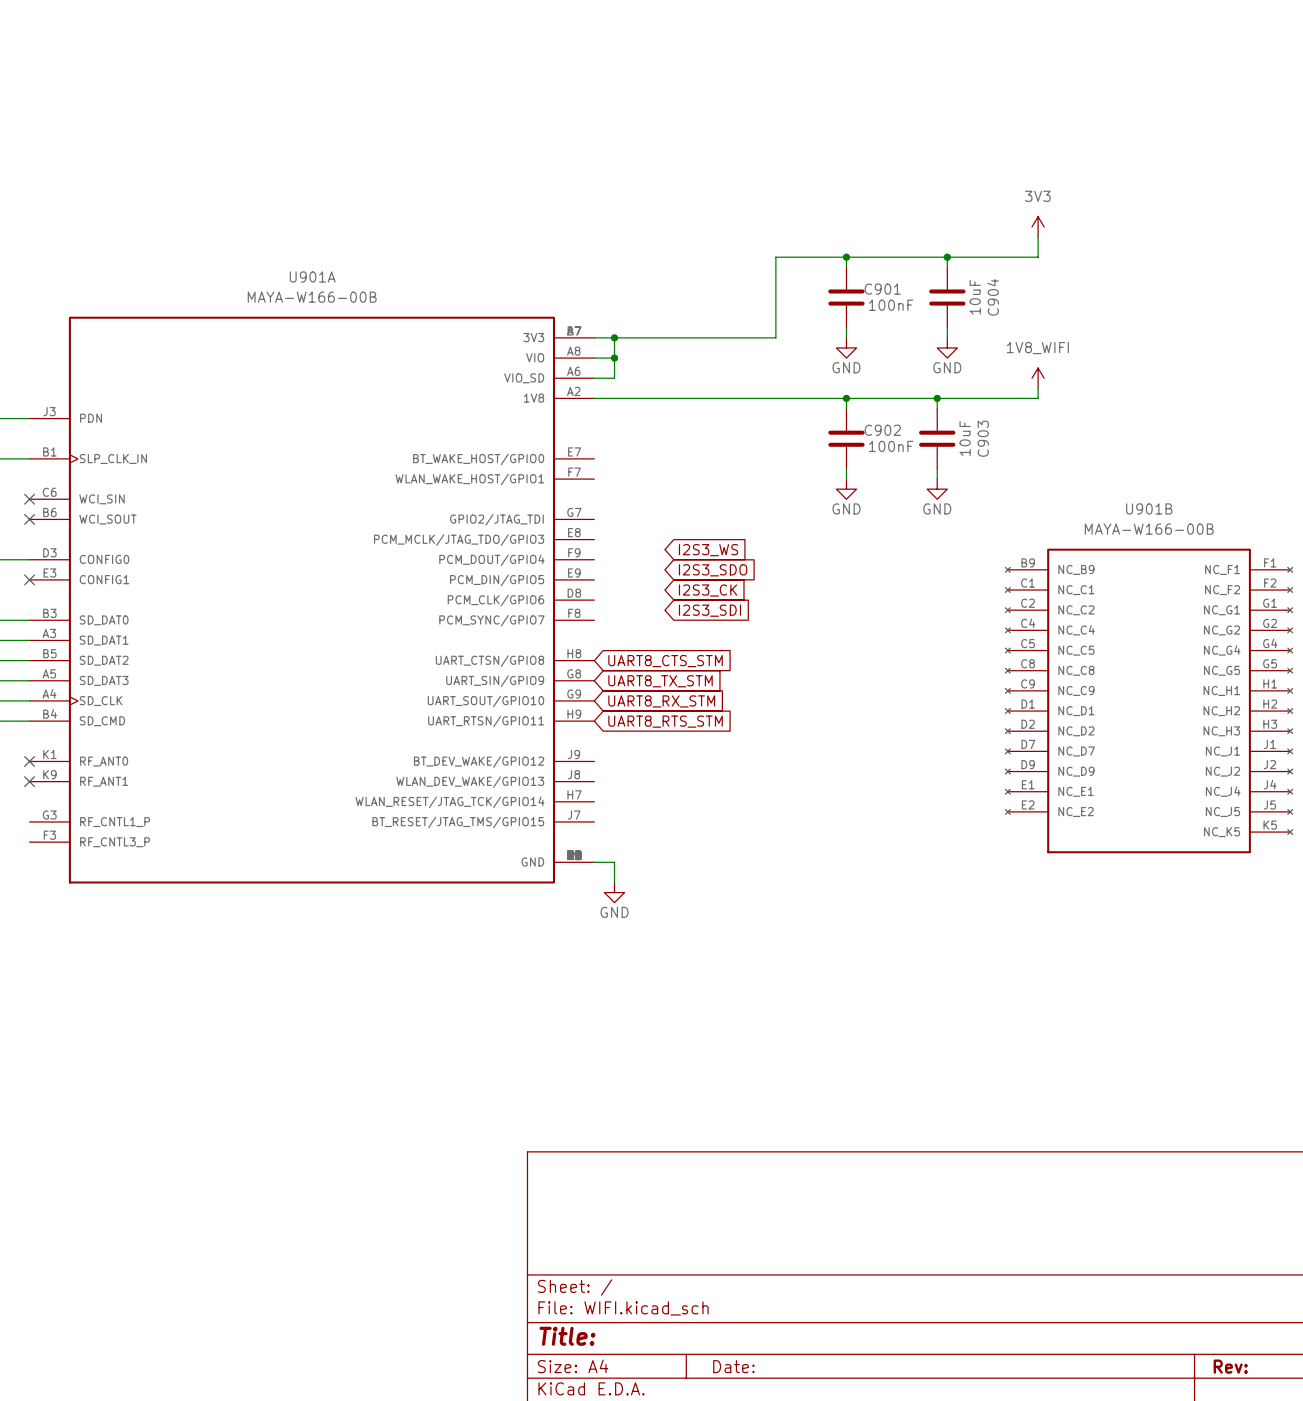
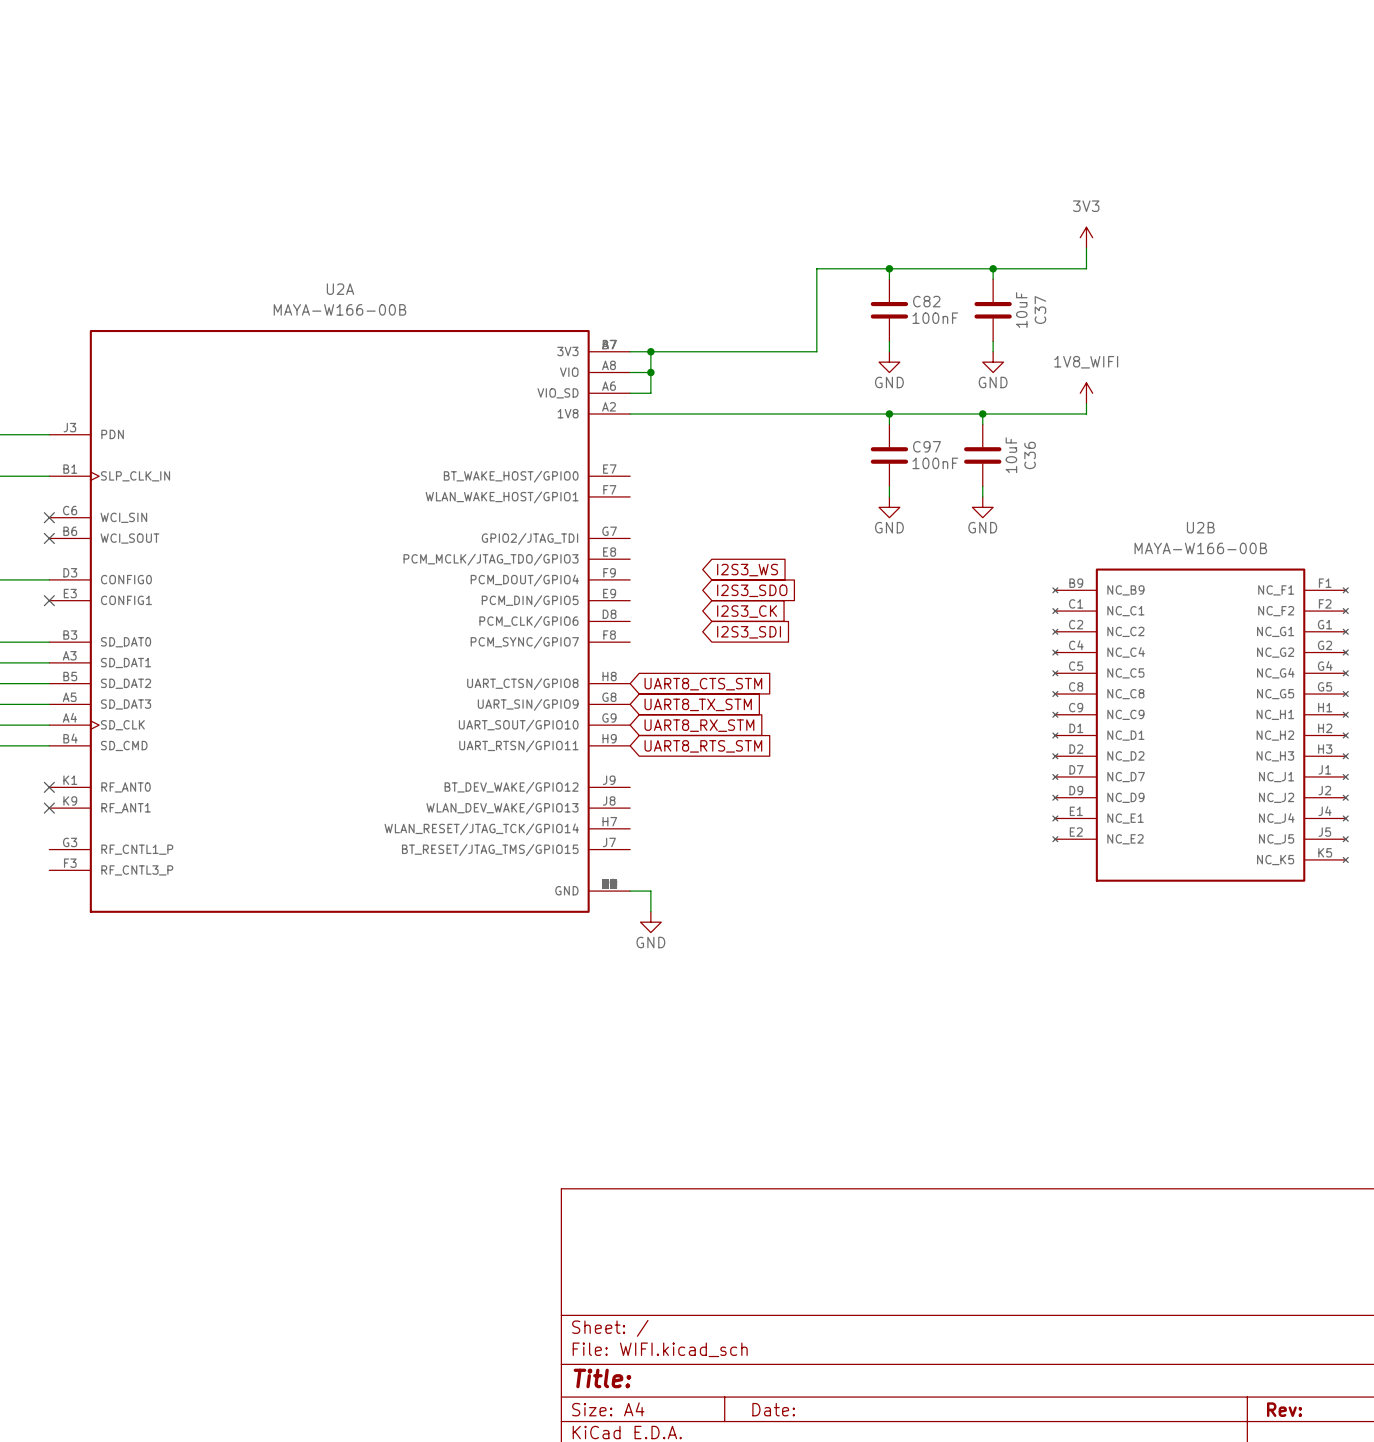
U901A name: U901A (312, 276) -> U2A (340, 289)
C901 name: C901 (882, 289) -> C82 (926, 301)
C904 name: C904 (993, 297) -> C37 (1040, 310)
C902 name: C902 (882, 430) -> C97 (927, 446)
C903 name: C903 (983, 438) -> C36 (1030, 455)
U901B name: U901B (1149, 508) -> U2B (1200, 527)

